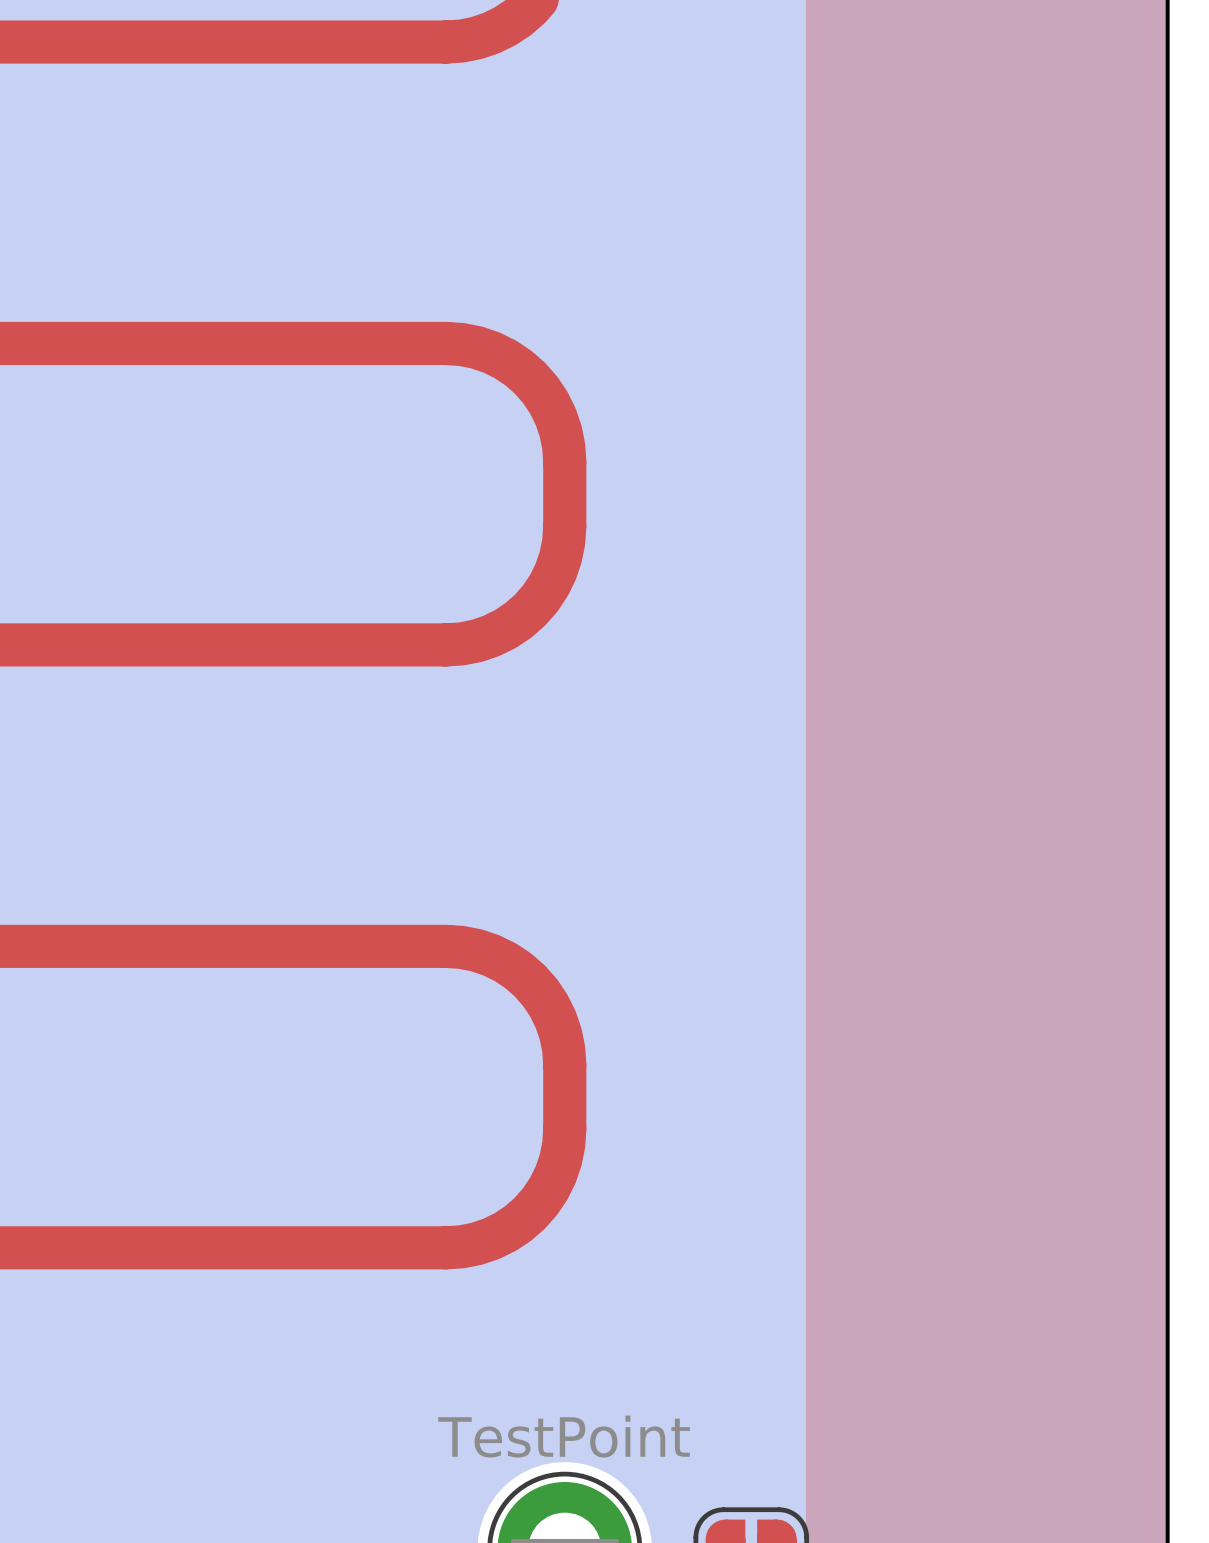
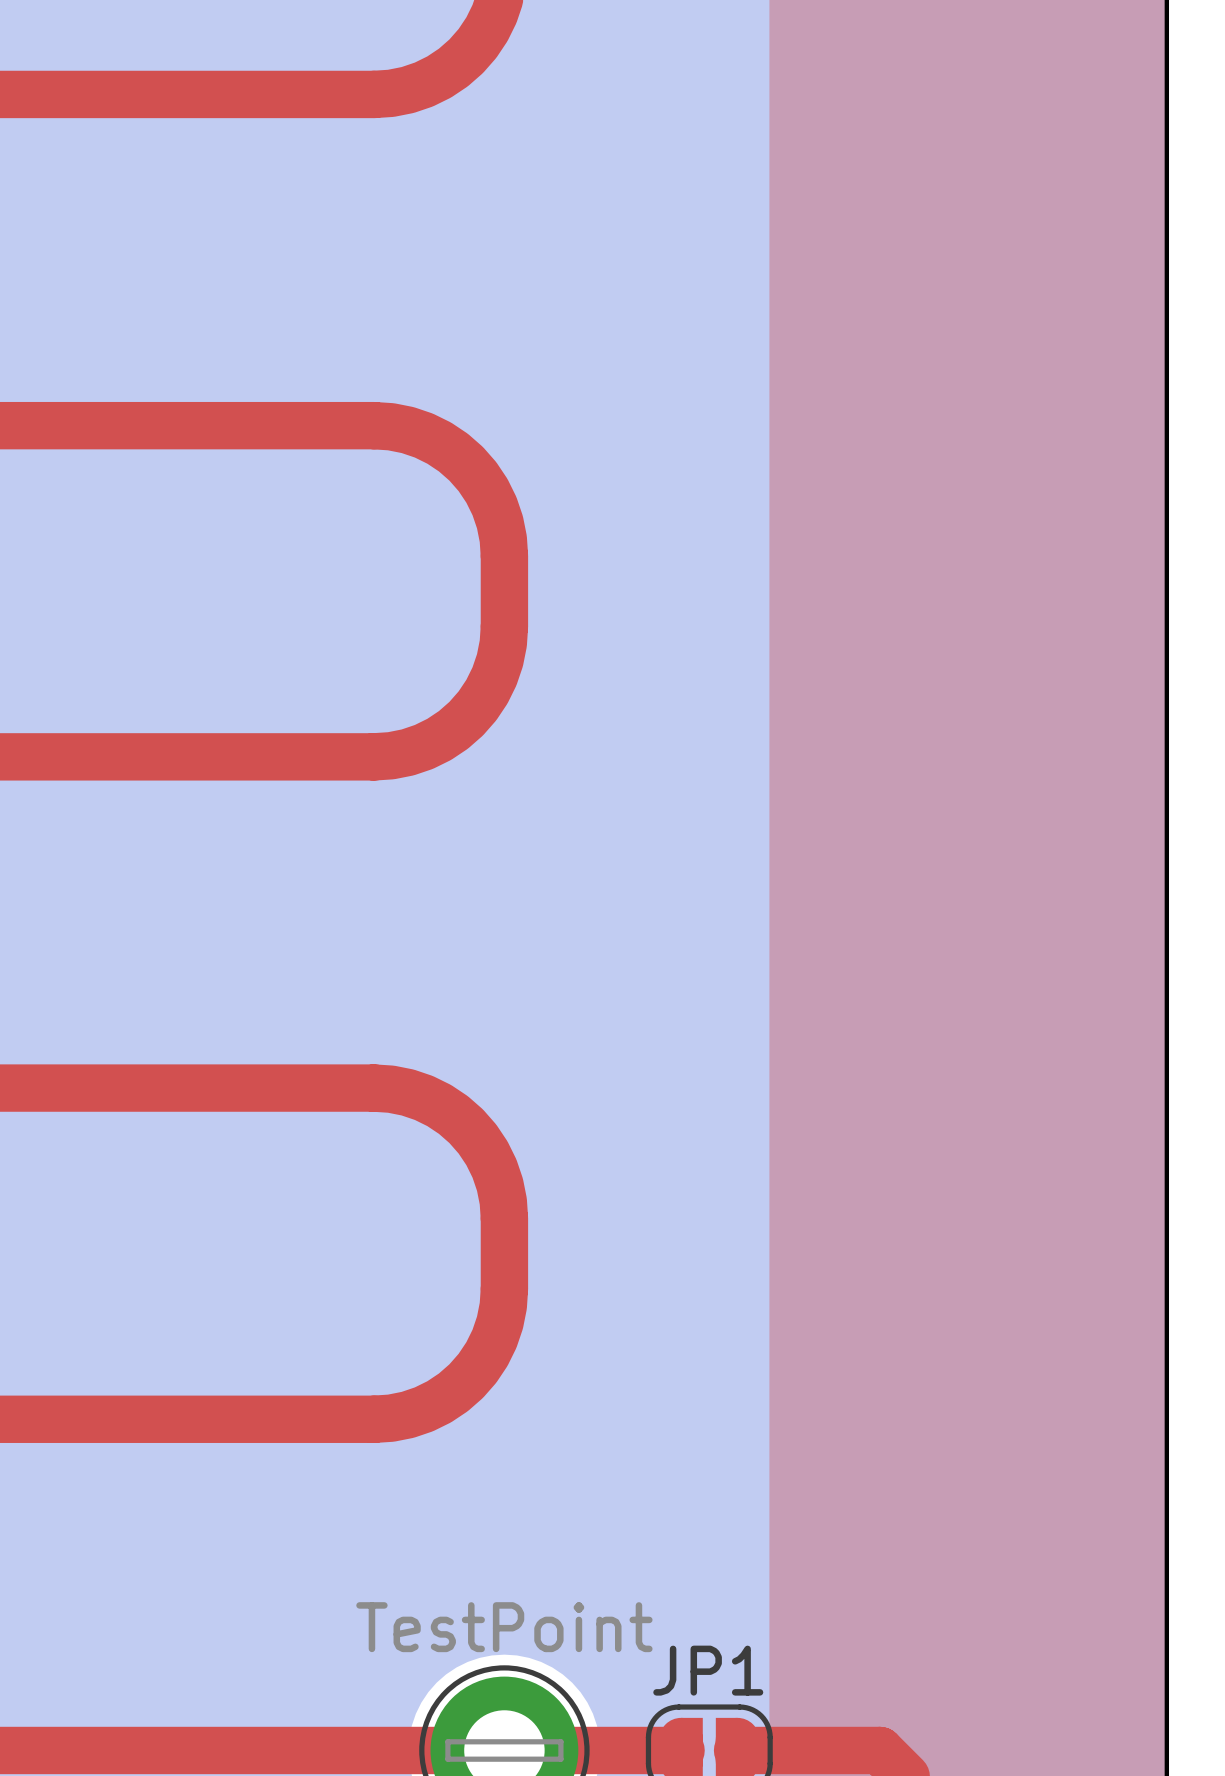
JP1 name: none -> JP1 (708, 1670)

